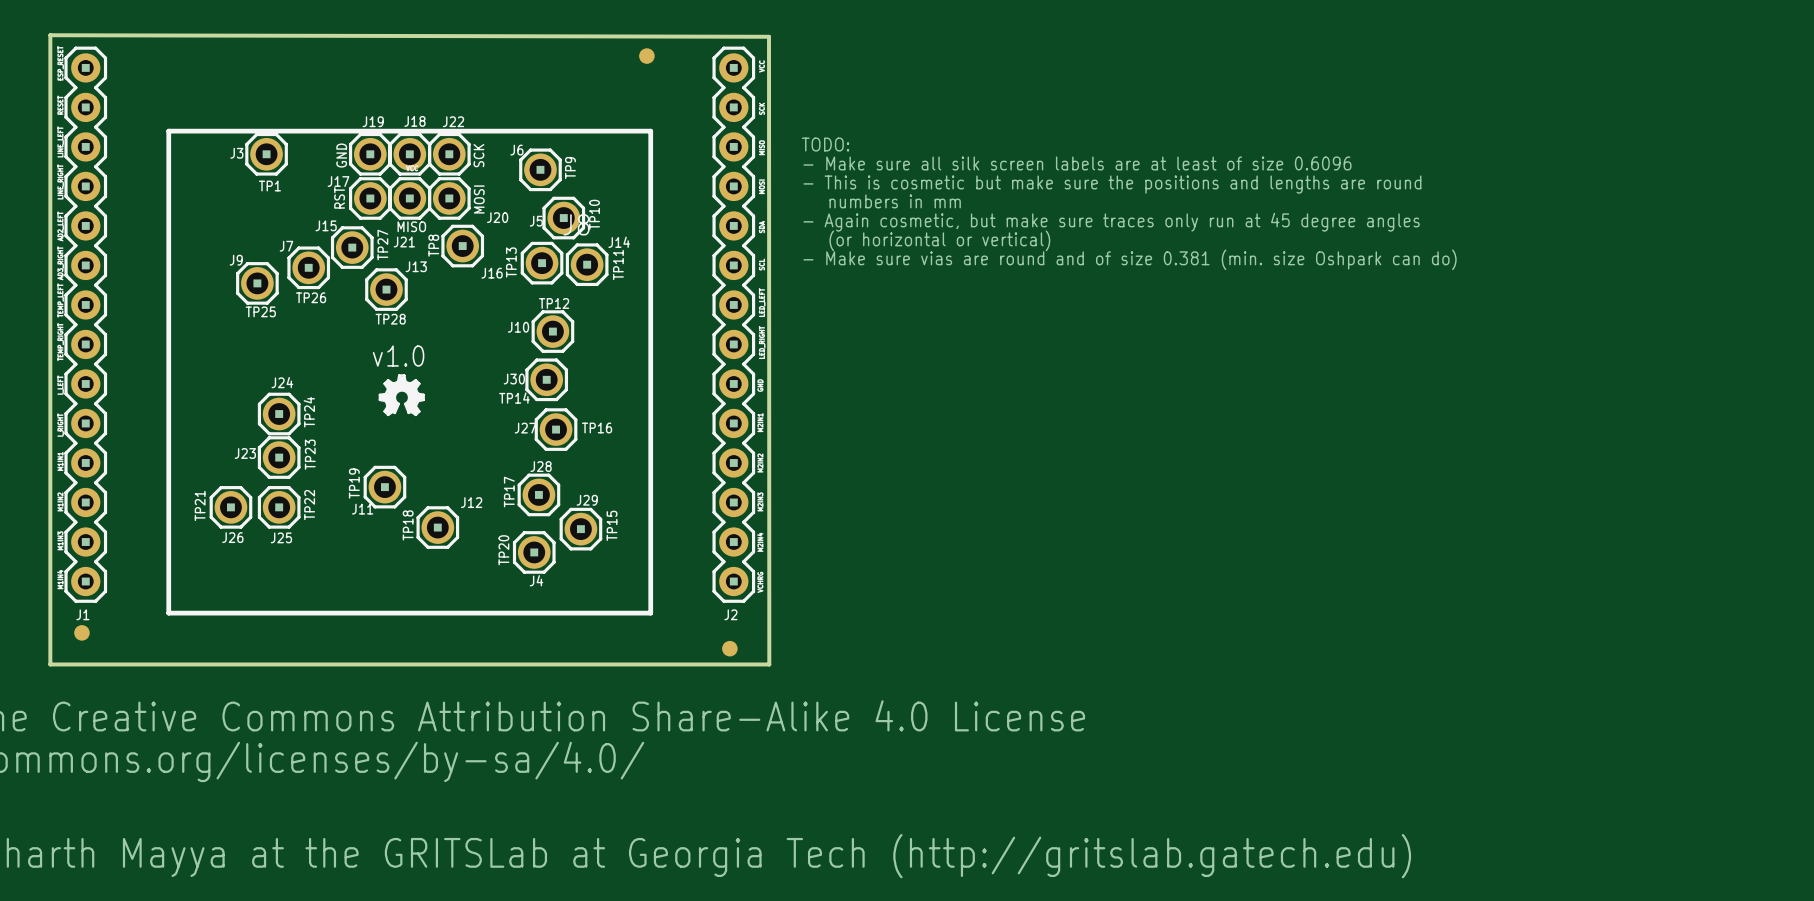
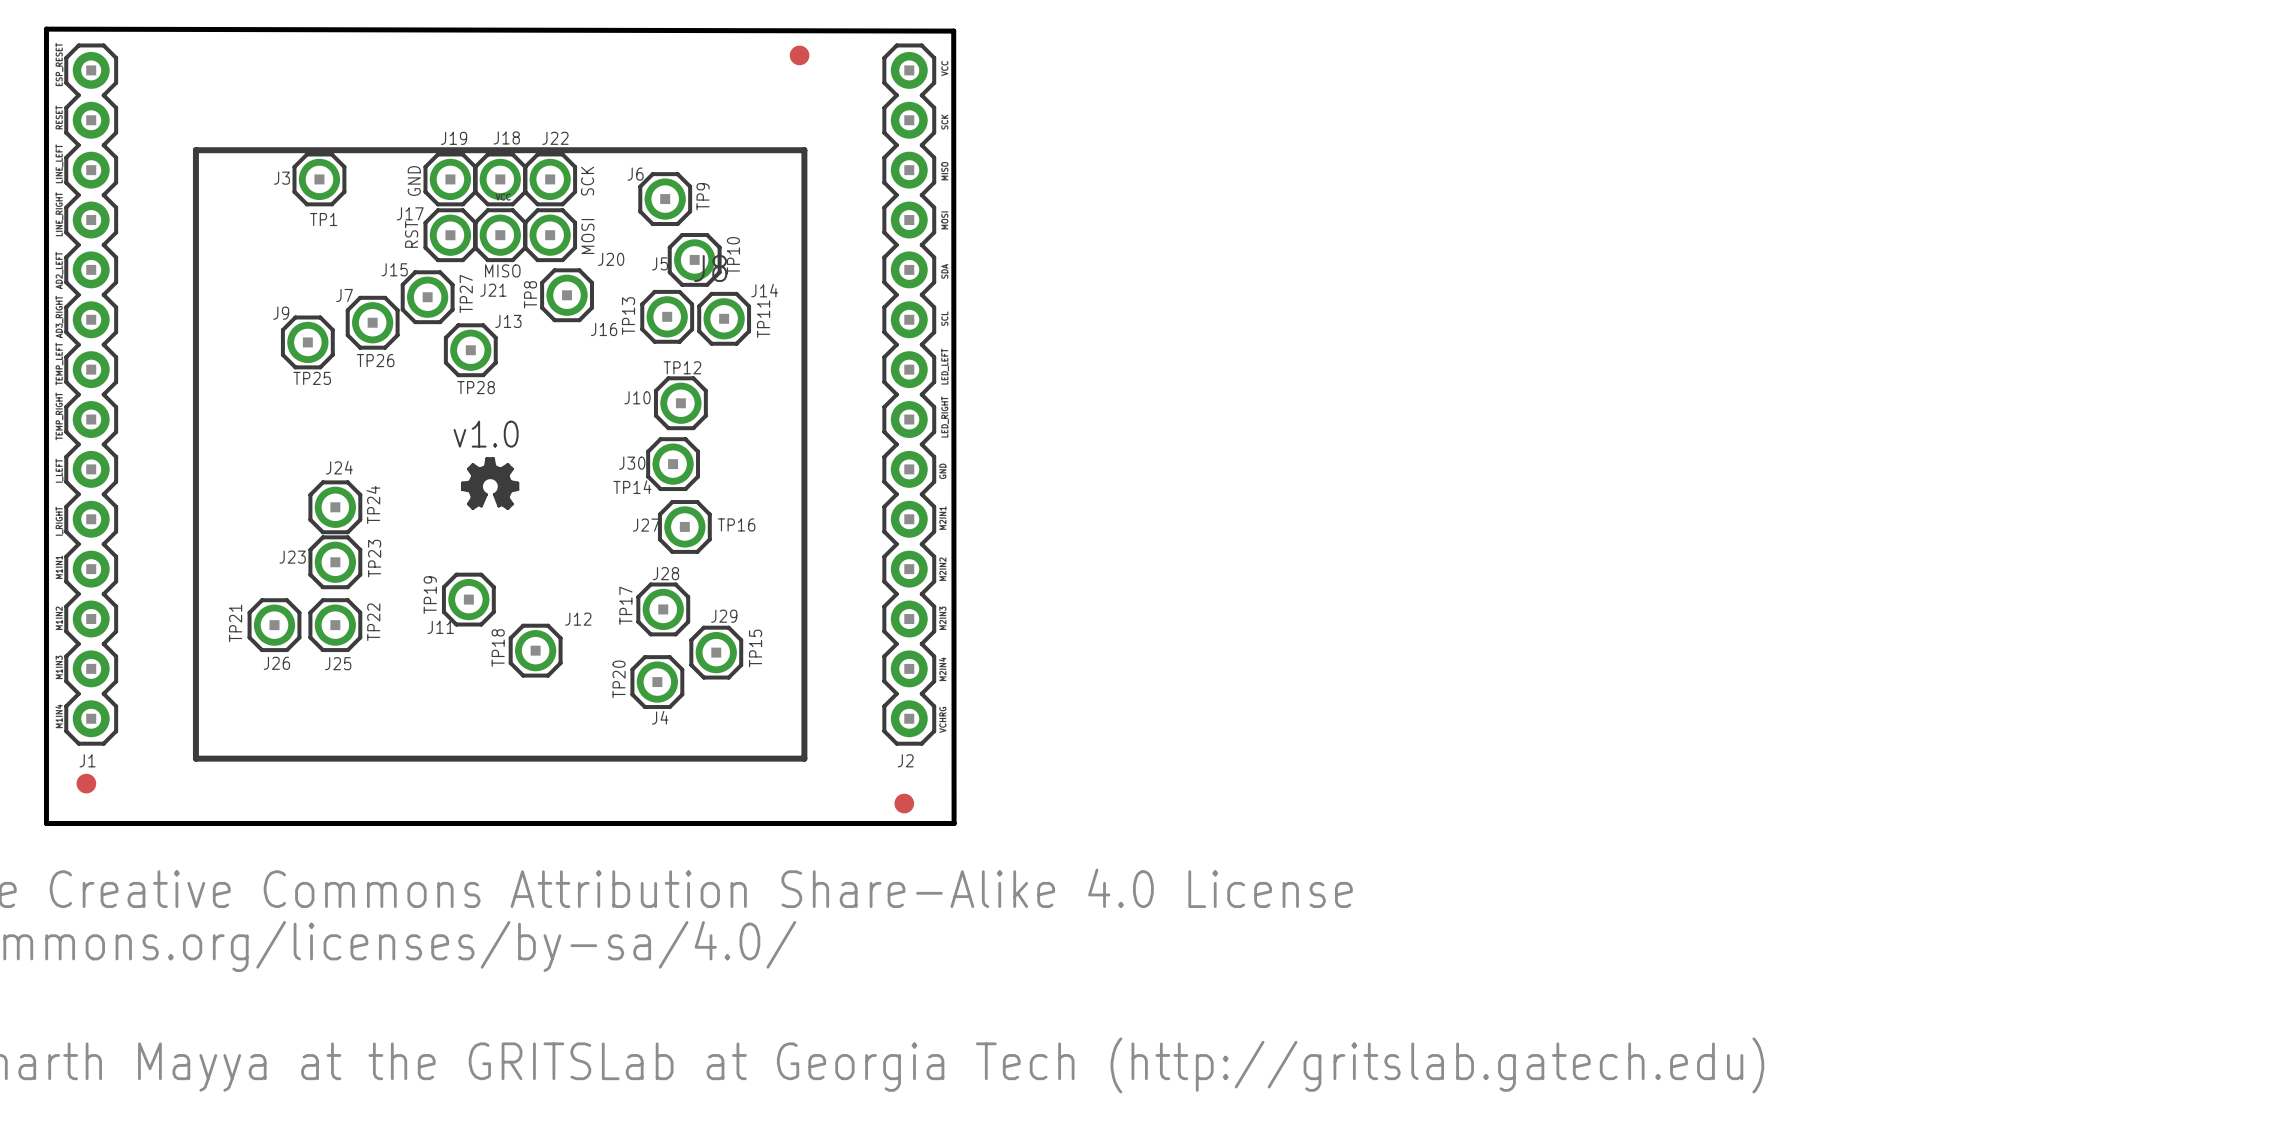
text: TODO: (825, 144) -> none
text: - Make sure all silk screen labels are at least of size 0.6096 (1077, 163) -> none
text: - This is cosmetic but make sure the positions and lengths are round (1112, 184) -> none
text: numbers in mm (895, 201) -> none
text: - Again cosmetic, but make sure traces only run at 45 degree angles (1111, 222) -> none
text: (or horizontal or vertical) (939, 240) -> none
text: - Make sure vias are round and of size 0.381 (min. size Oshpark can do) (1130, 259) -> none

